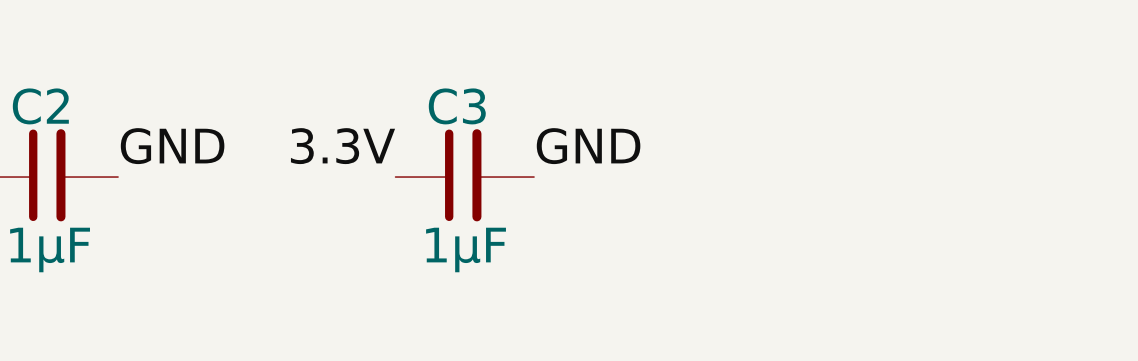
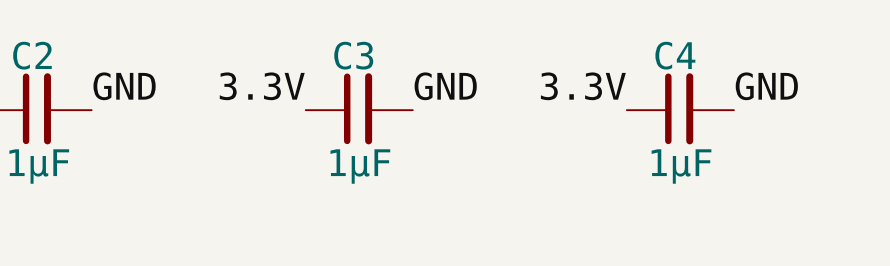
label: none -> 3.3V (583, 86)
label: none -> GND (766, 86)
C4: none -> 1μF (680, 108)

